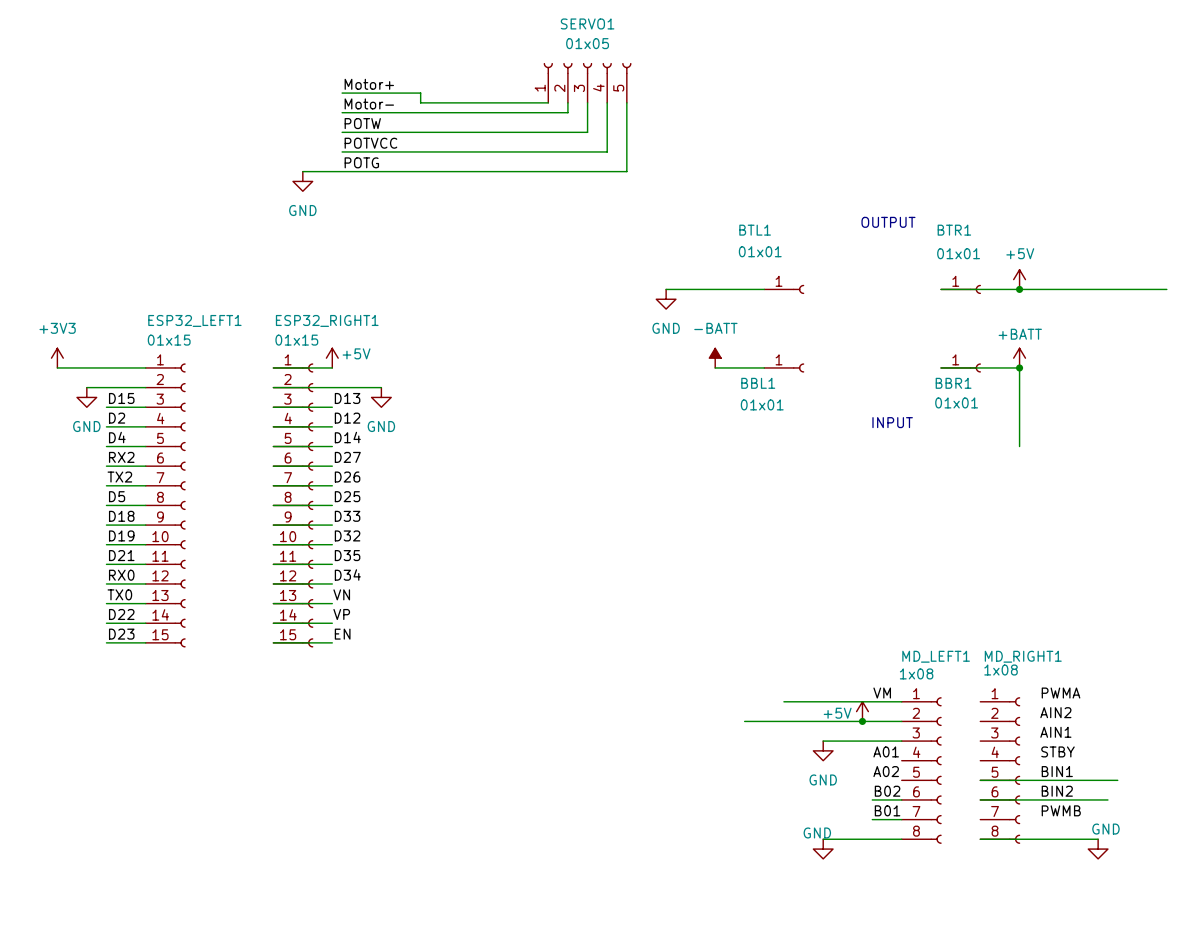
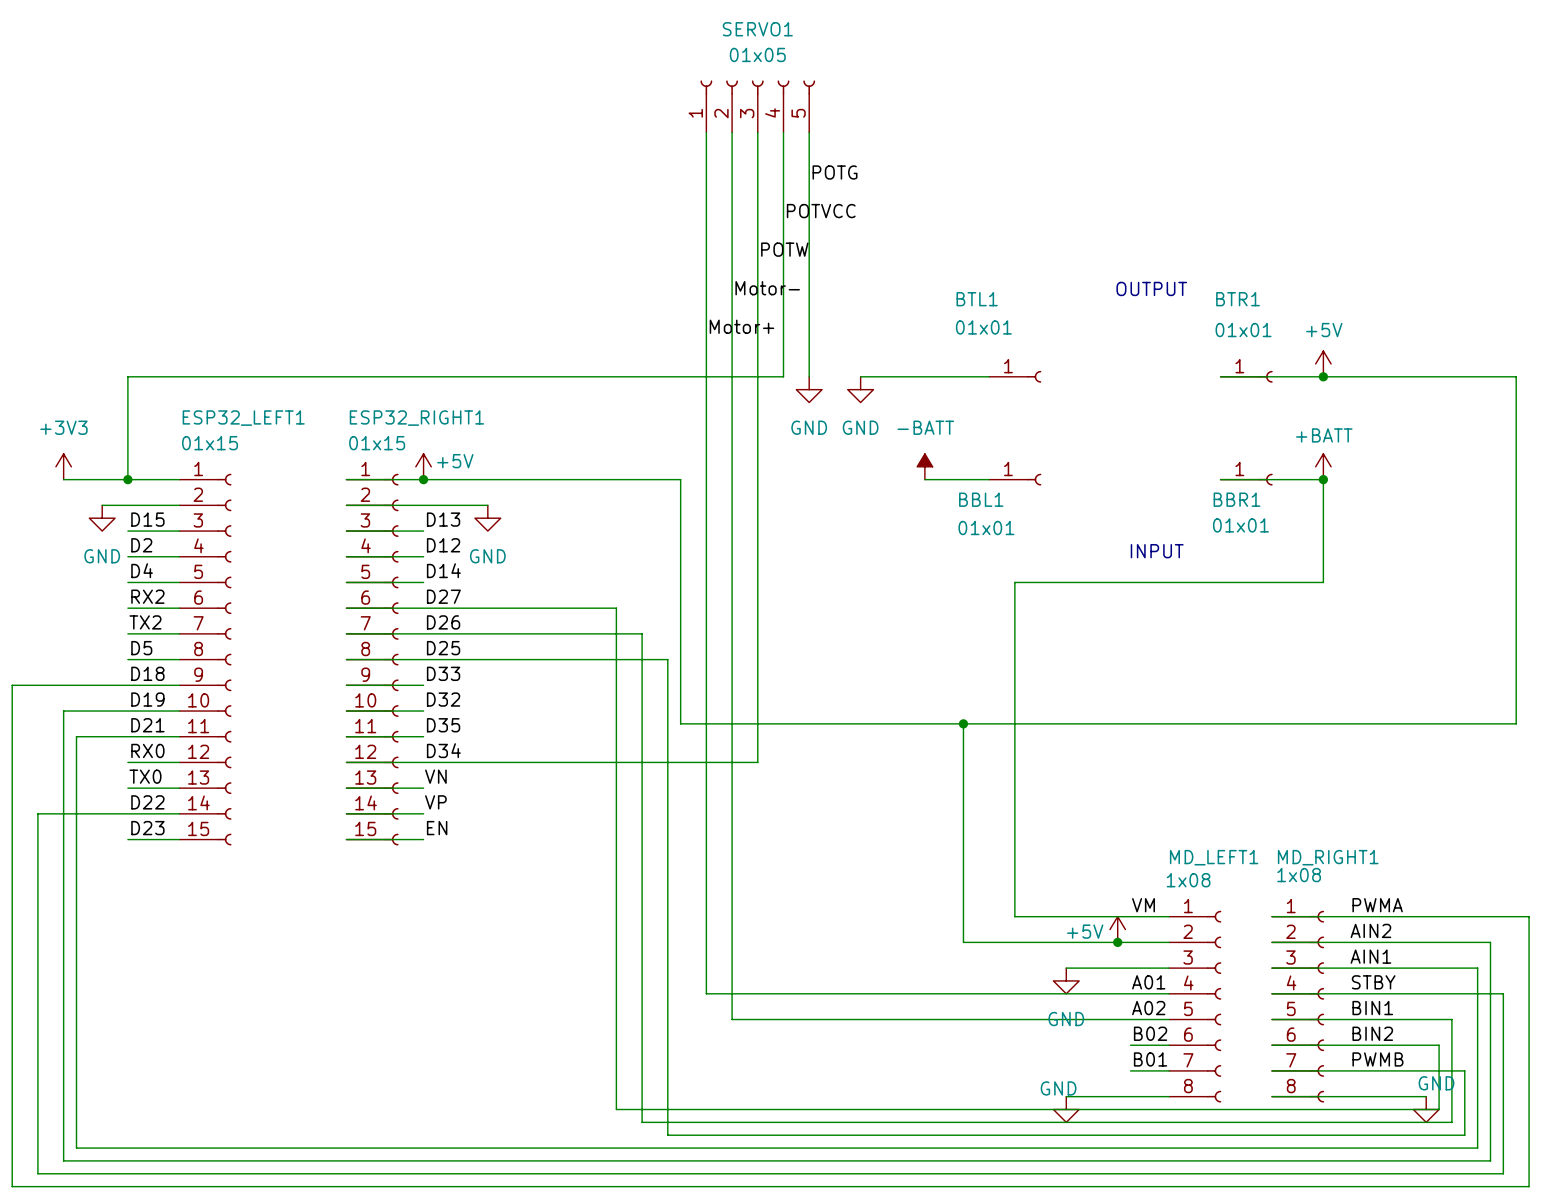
label: Motor+ (369, 84) -> none
wire: (342, 93) (420, 93) (420, 102) (548, 102) -> (1169, 993) (706, 993) (706, 132)
label: Motor- (369, 103) -> none
wire: (342, 112) (567, 112) -> (1169, 1019) (732, 1019) (732, 145)
label: POTW (362, 123) -> none
wire: (342, 132) (587, 132) -> (423, 762) (757, 762) (757, 171)
label: none -> POTG (835, 172)
label: POTVCC (370, 143) -> none
wire: (342, 151) (607, 151) -> (127, 479) (127, 376) (783, 376) (783, 196)
label: POTG (361, 162) -> none
label: none -> POTVCC (821, 211)
wire: (302, 171) (626, 171) -> (809, 376) (809, 222)
power symbol: GND (302, 181) -> none
label: none -> POTW (784, 249)
label: none -> Motor- (767, 288)
label: none -> Motor+ (741, 326)
wire: none -> (1516, 376) (1516, 723) (680, 723) (680, 479) (423, 479)
power symbol: none -> GND (809, 389)
junction: none -> (127, 479)
junction: none -> (423, 479)
wire: none -> (1323, 582) (1014, 582) (1014, 916)
wire: none -> (423, 608) (616, 608) (616, 1109) (1439, 1109) (1439, 1045)
wire: none -> (423, 633) (642, 633) (642, 1122) (1451, 1122) (1451, 1019)
wire: none -> (423, 659) (667, 659) (667, 1135) (1464, 1135) (1464, 1070) (1271, 1070)
wire: none -> (127, 685) (12, 685) (12, 1186) (1529, 1186) (1529, 916) (1271, 916)
wire: none -> (127, 711) (63, 711) (63, 1160) (1490, 1160) (1490, 942) (1271, 942)
wire: none -> (963, 723) (963, 942)
junction: none -> (963, 723)
wire: none -> (127, 736) (76, 736) (76, 1148) (1477, 1148) (1477, 968) (1271, 968)
wire: none -> (127, 813) (37, 813) (37, 1173) (1503, 1173) (1503, 993) (1271, 993)

